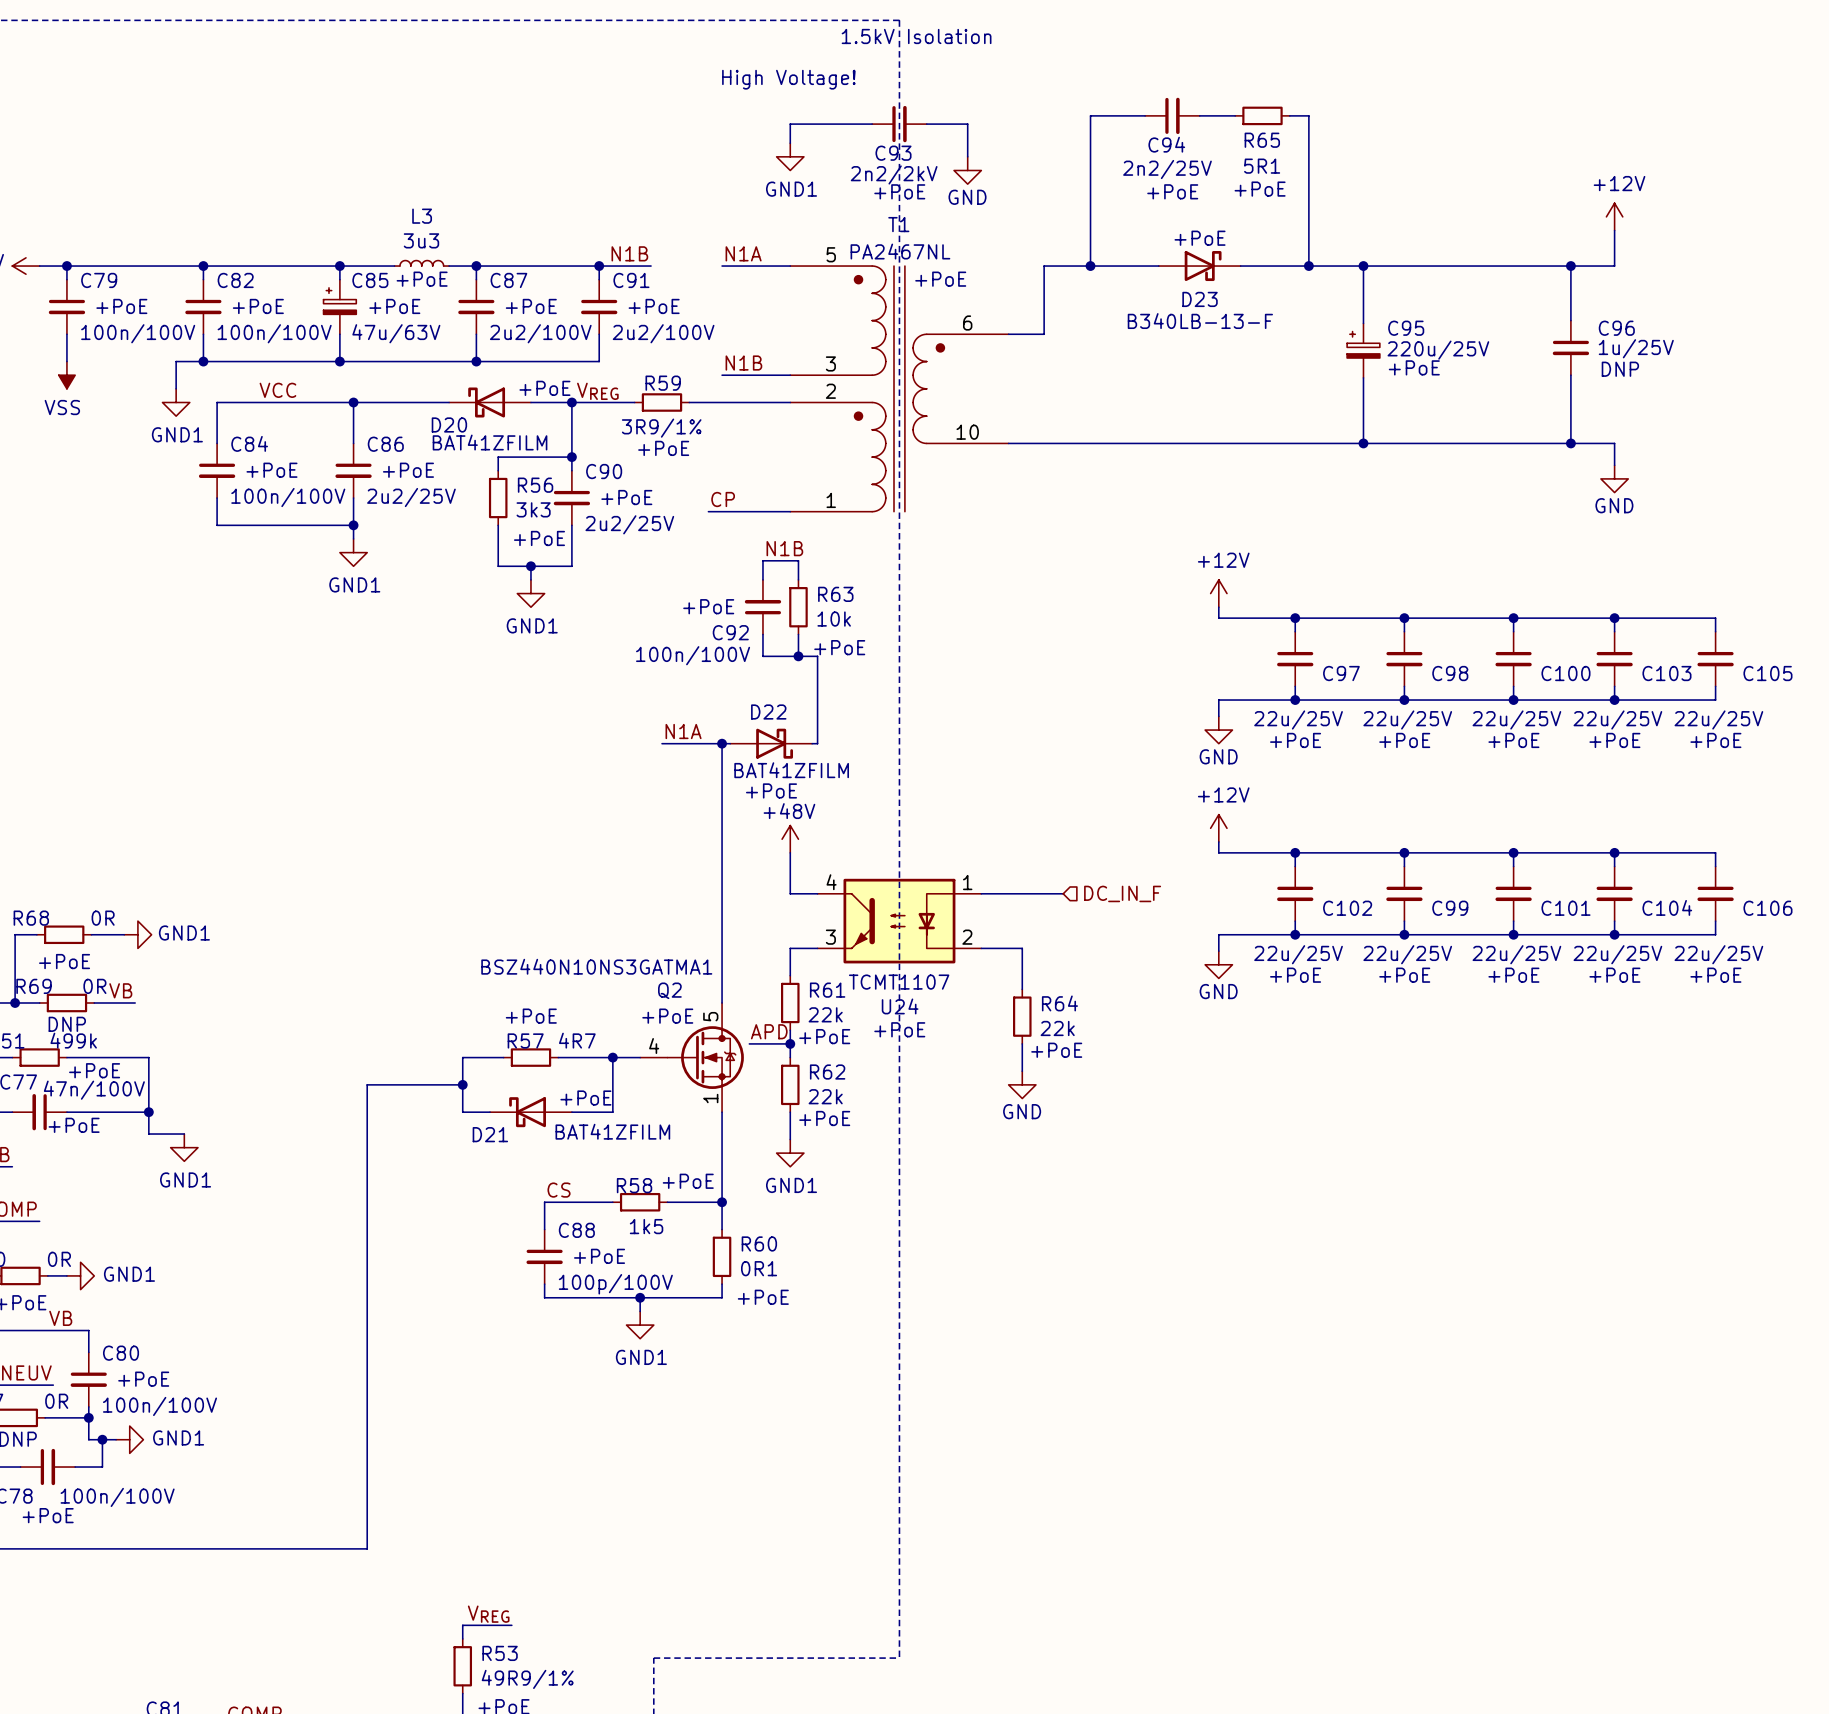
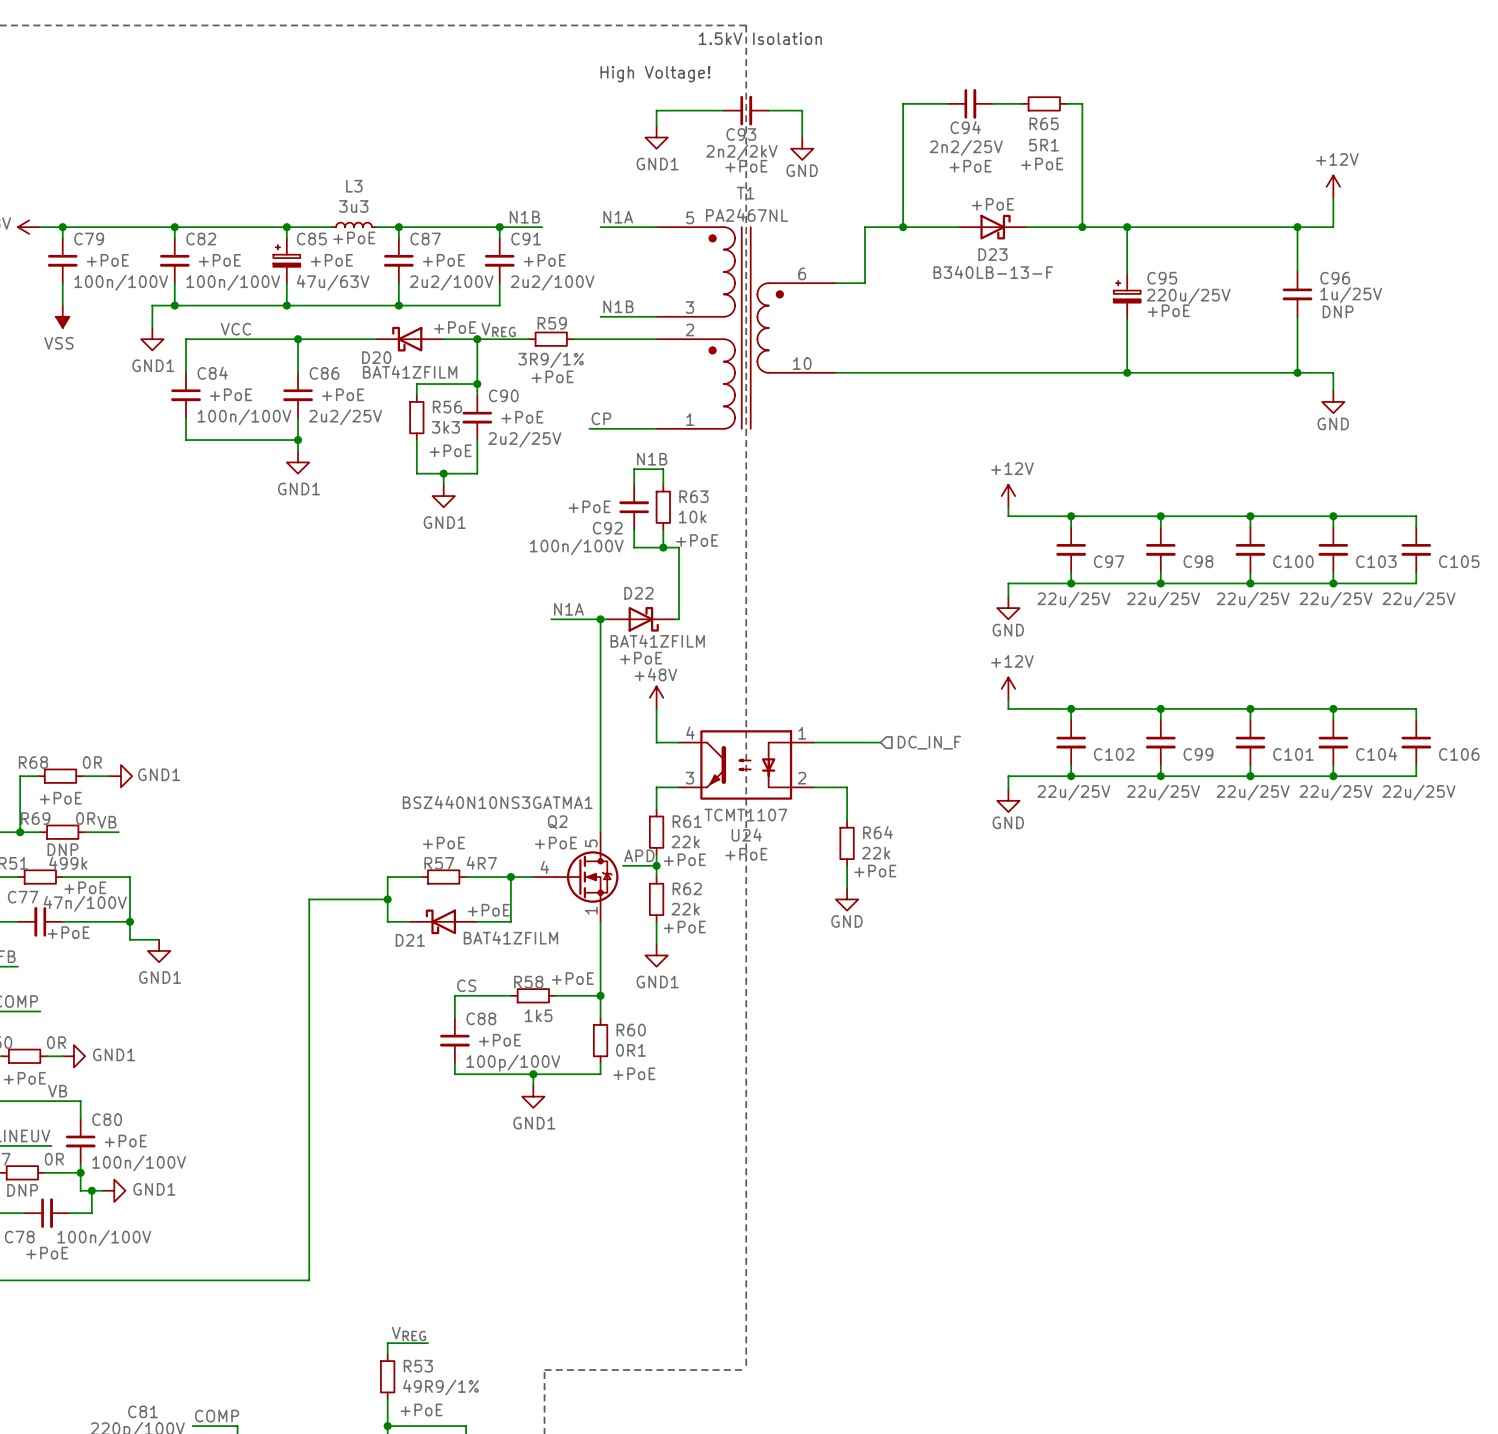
T1 text: +PoE (940, 279) -> none
C97 text: +PoE (1295, 740) -> none
C98 text: +PoE (1404, 740) -> none
C100 text: +PoE (1513, 740) -> none
C103 text: +PoE (1614, 740) -> none
C105 text: +PoE (1715, 740) -> none
C102 text: +PoE (1295, 975) -> none
C99 text: +PoE (1404, 975) -> none
C101 text: +PoE (1513, 975) -> none
C104 text: +PoE (1614, 975) -> none
C106 text: +PoE (1715, 975) -> none

